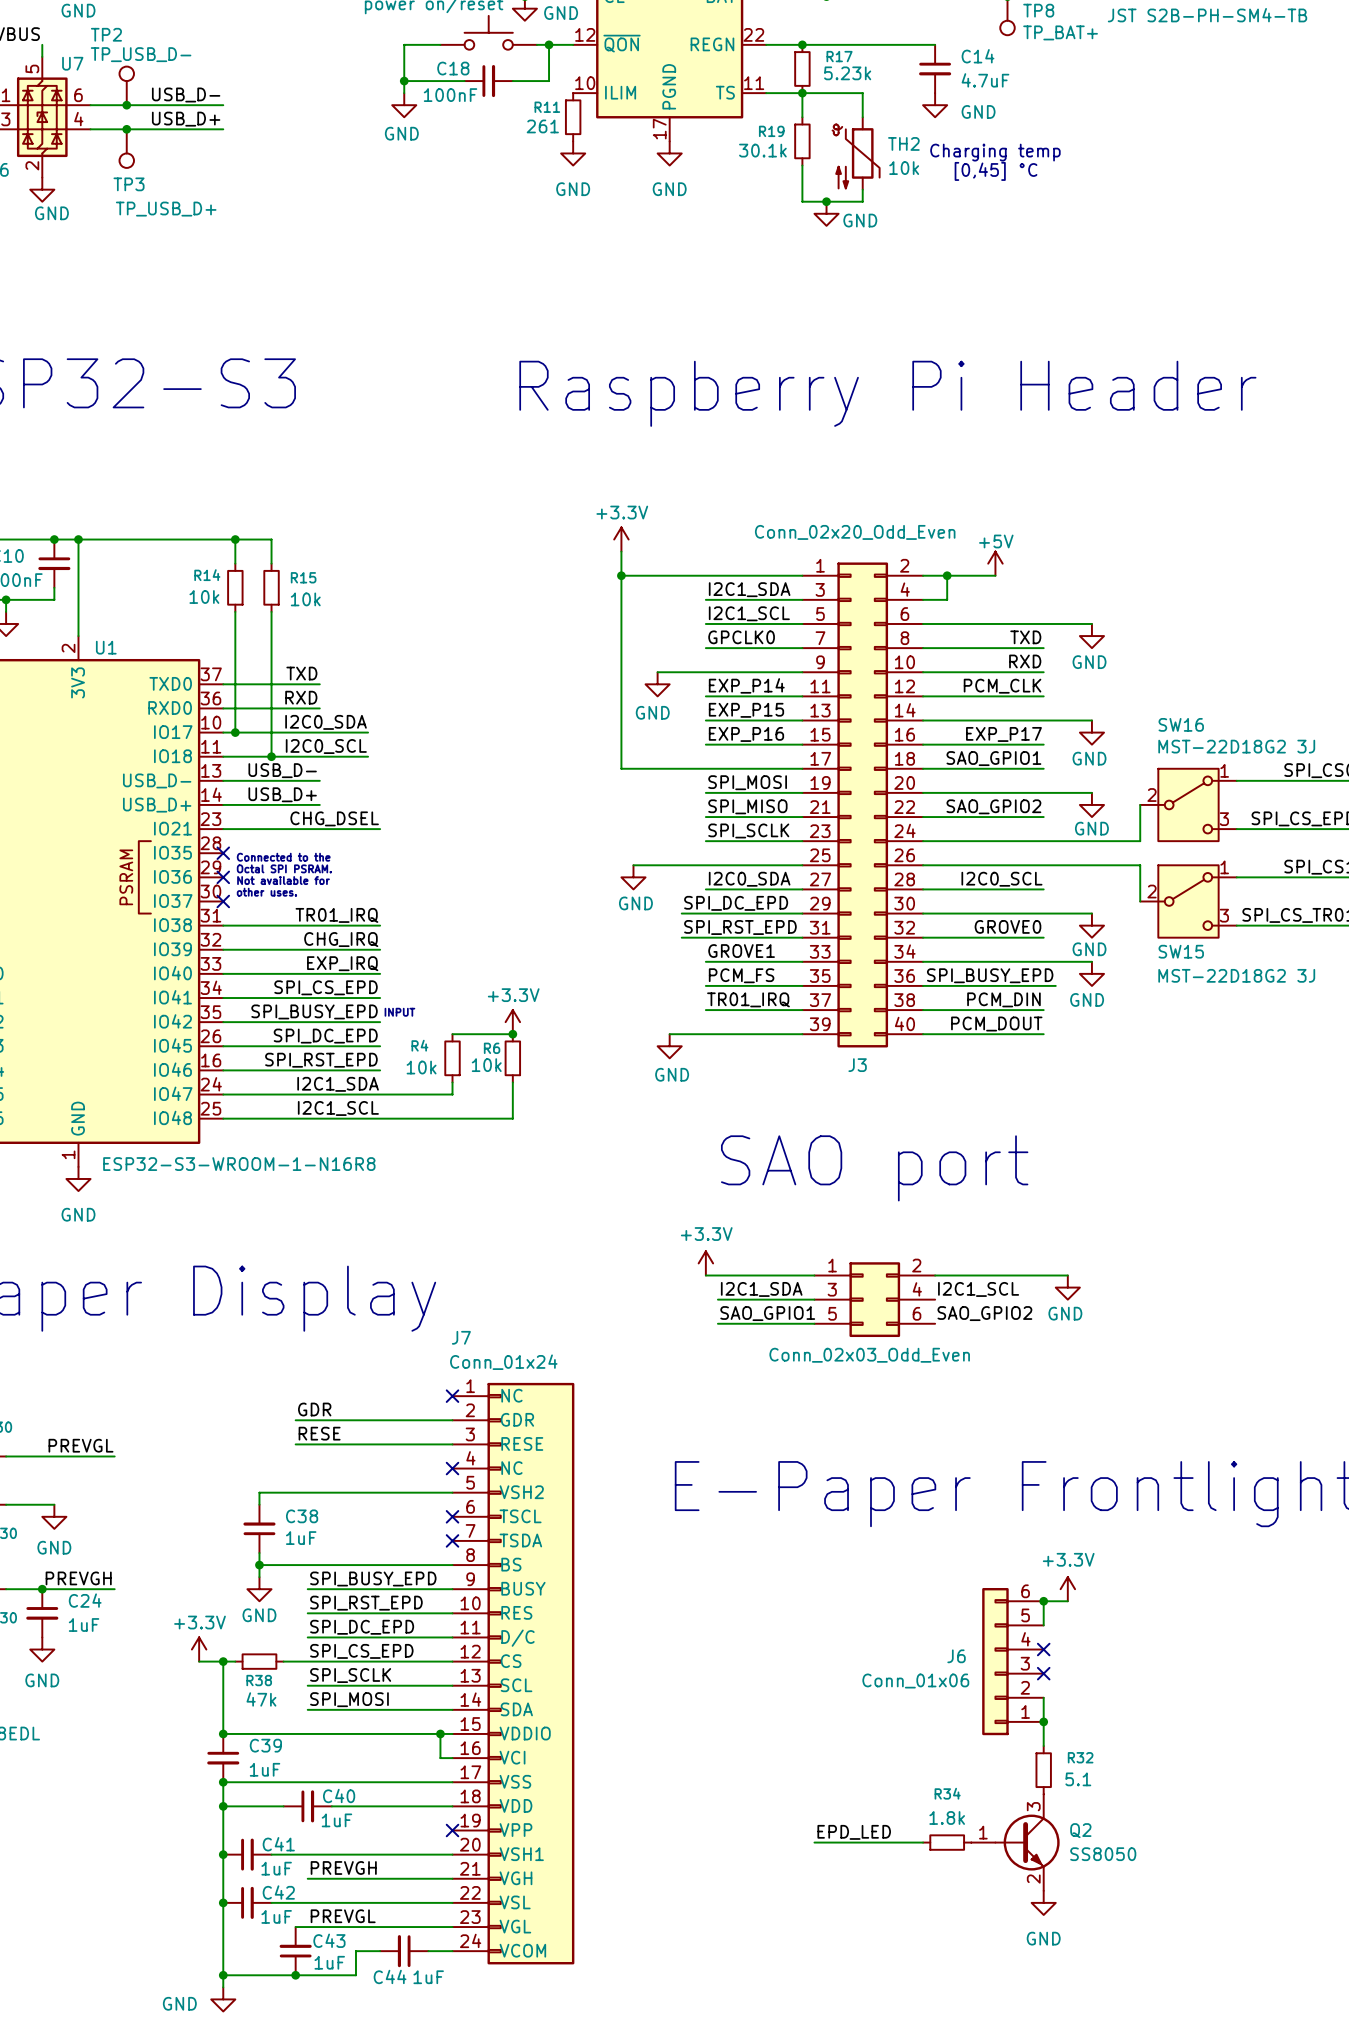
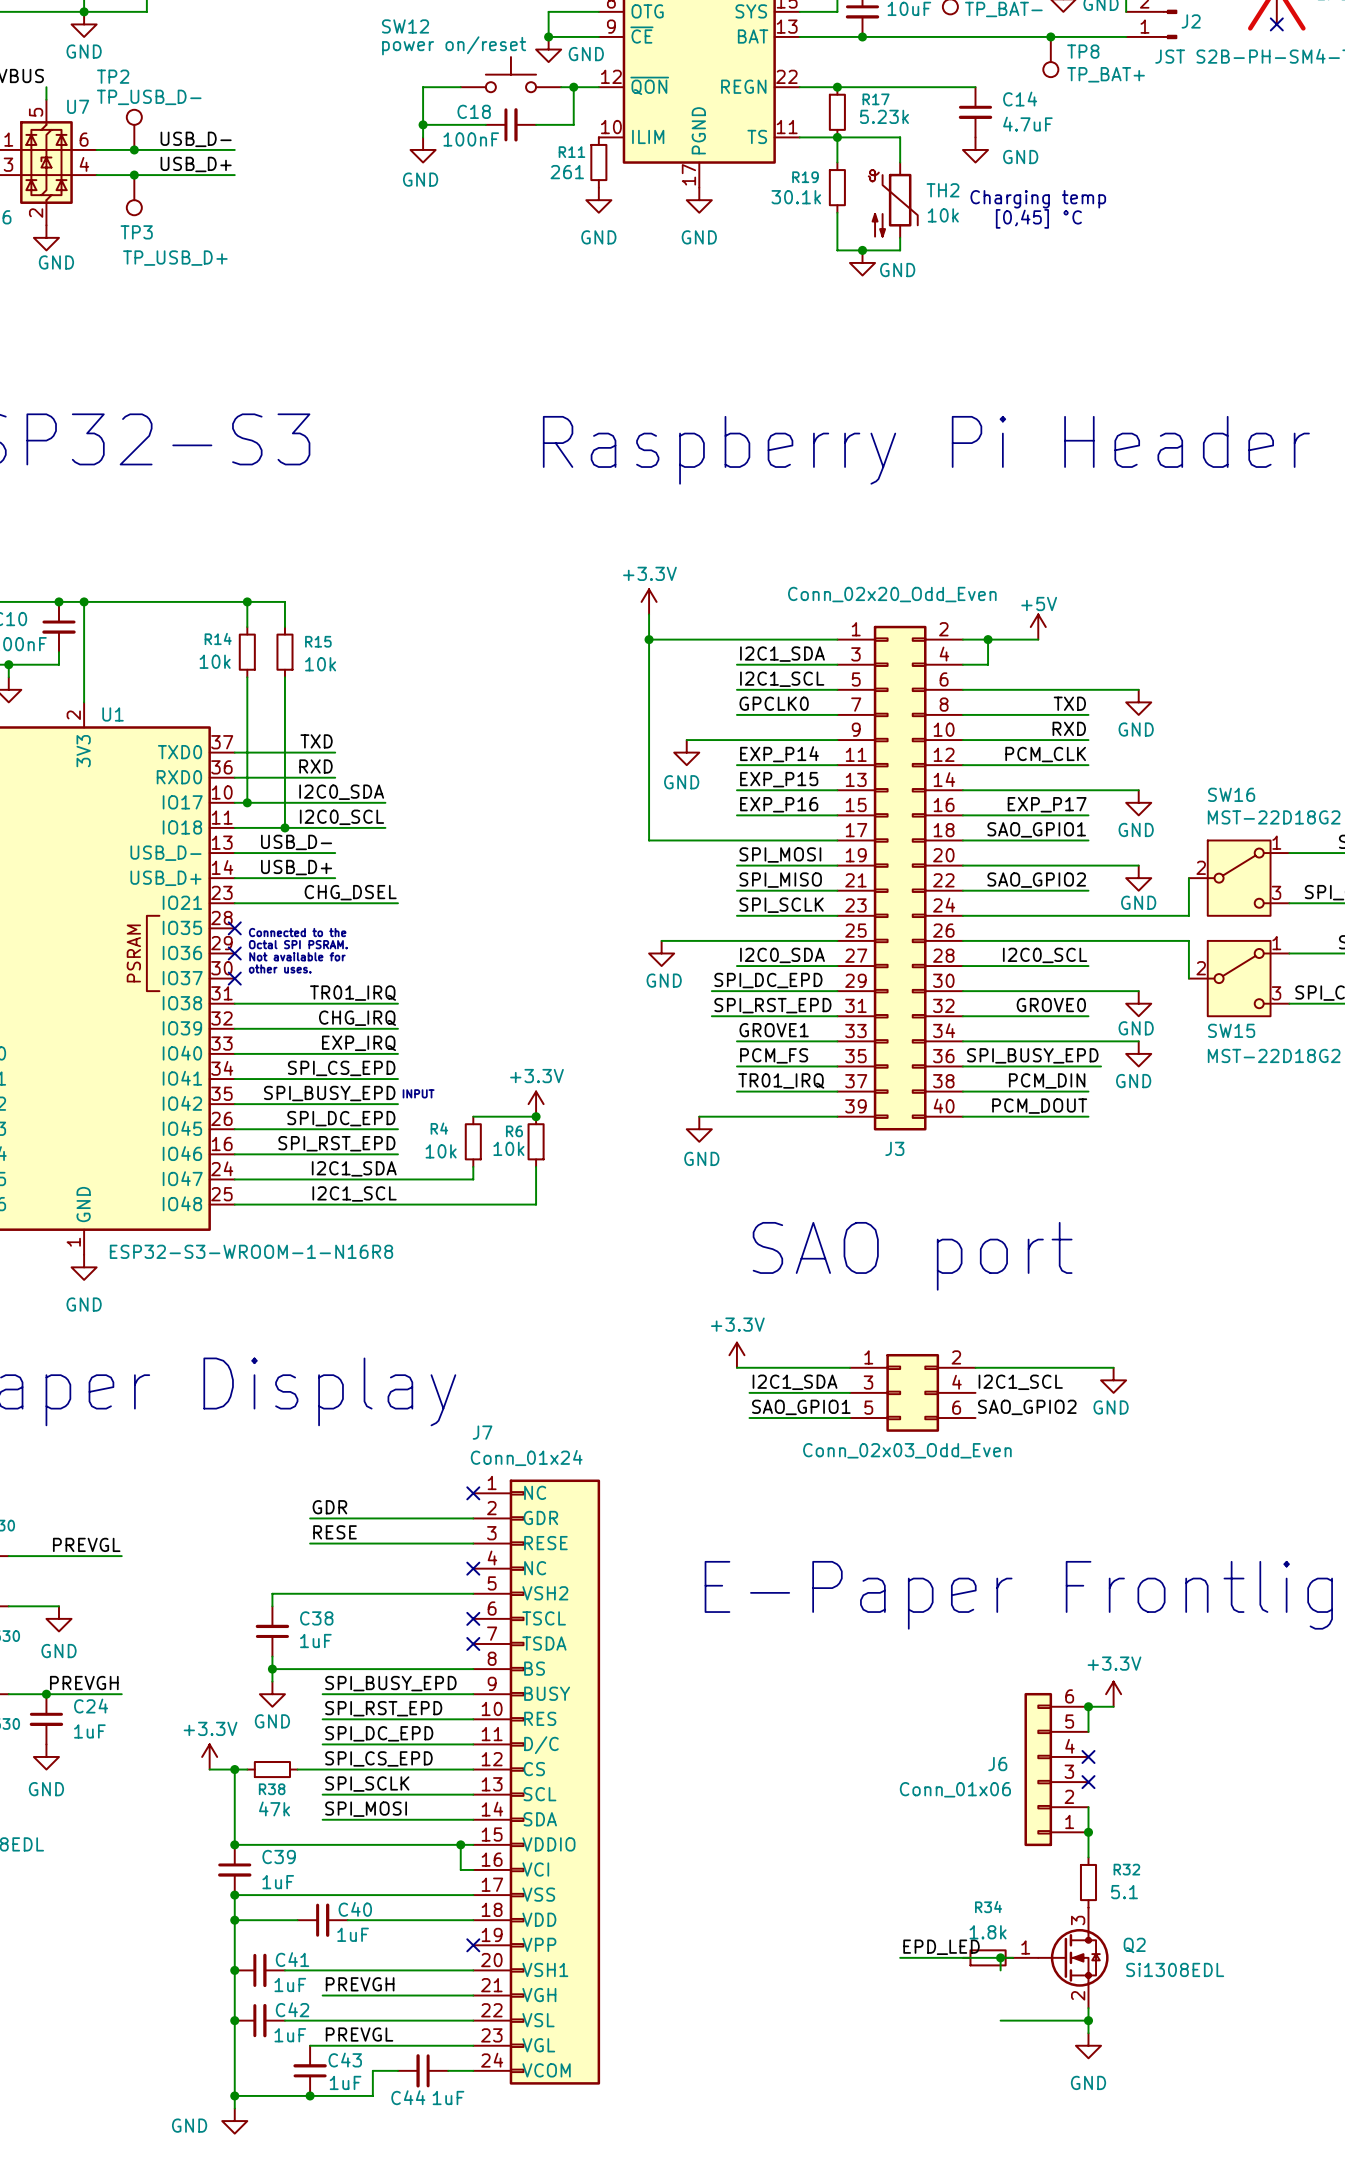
Q2 symbol: [971, 1794, 1060, 1891] -> [1013, 1907, 1109, 2009]
label position: EPD_LED (854, 1832) -> EPD_LED (941, 1947)
wire: (814, 1842) (862, 1842) -> (962, 1957) (1013, 1957)
wire: none -> (1000, 1957) (1000, 1970)
junction: none -> (1000, 1957)
Q2 value: SS8050 (1103, 1854) -> Si1308EDL (1175, 1969)
wire: none -> (1000, 2020) (1088, 2020)
power symbol position: GND (1043, 1902) -> GND (1088, 2045)
junction: none -> (1088, 2020)

